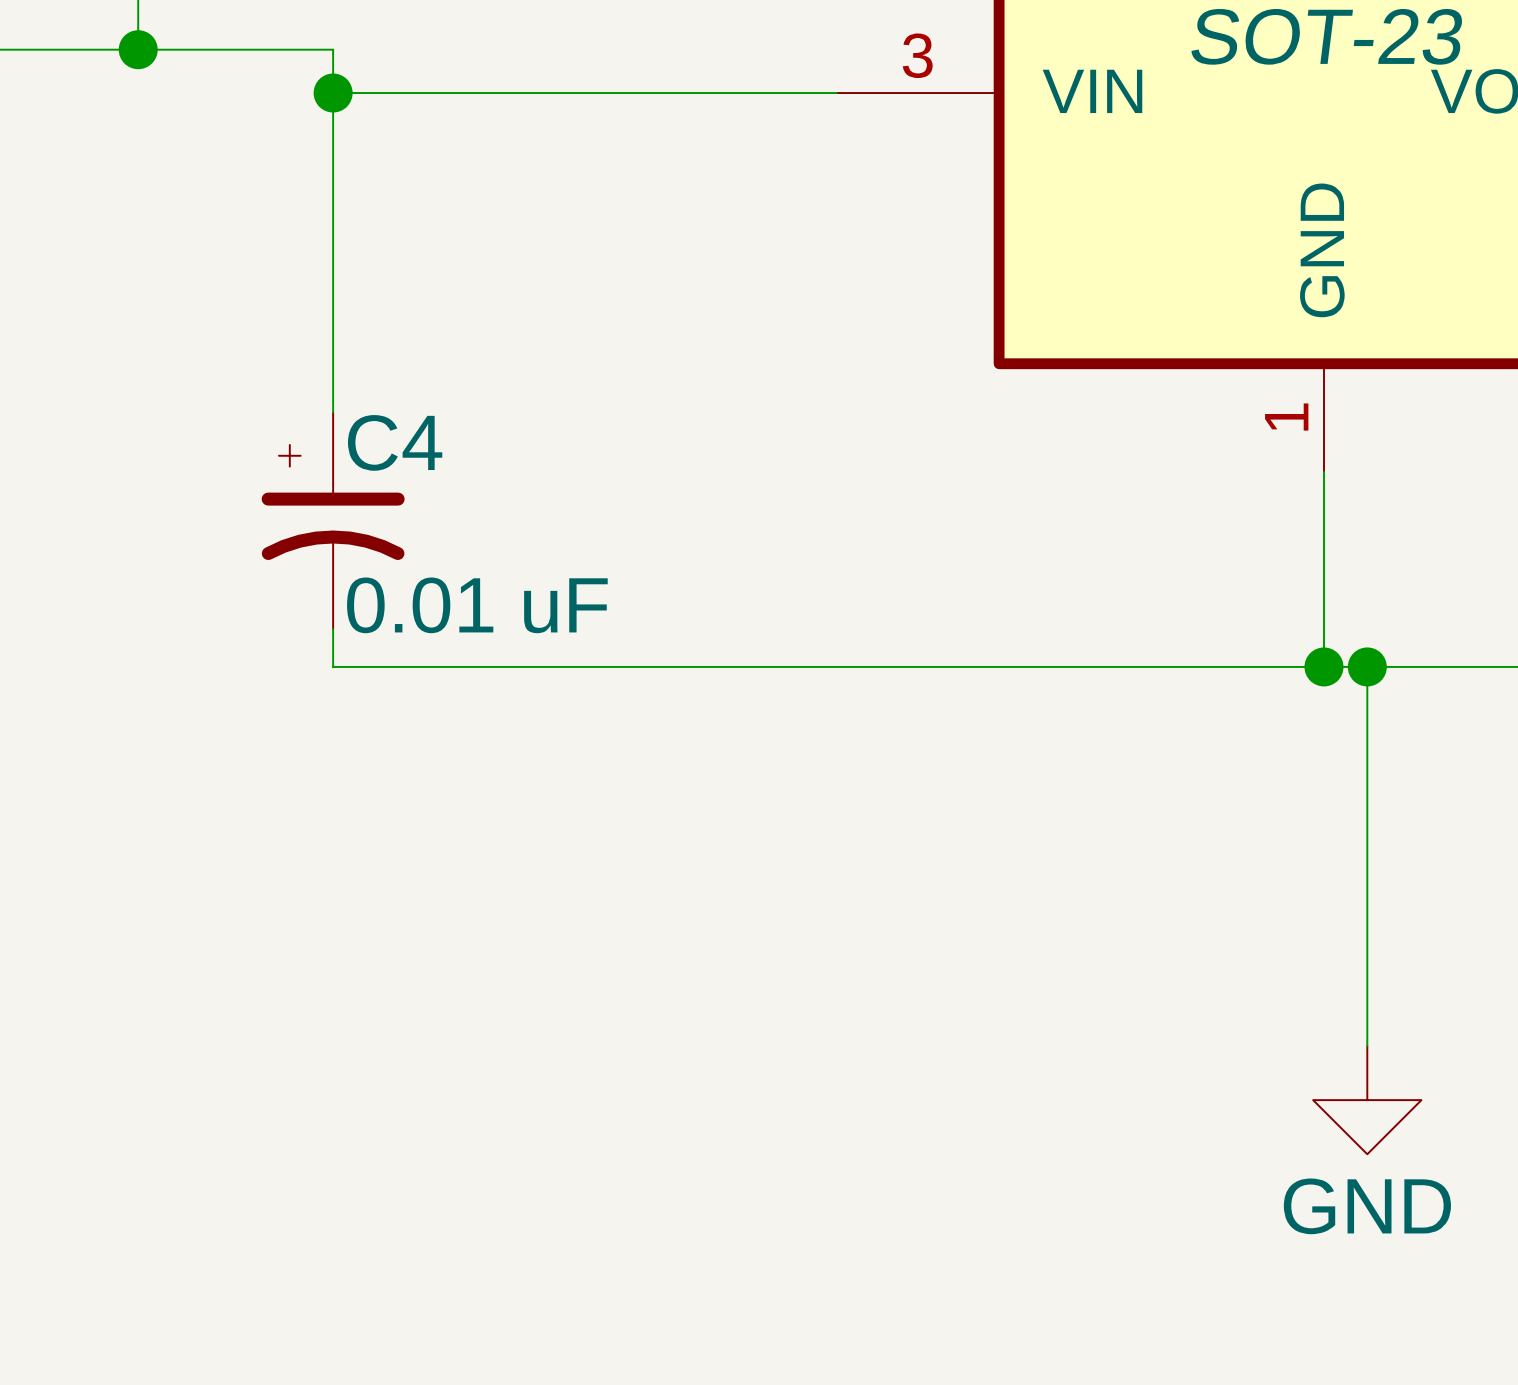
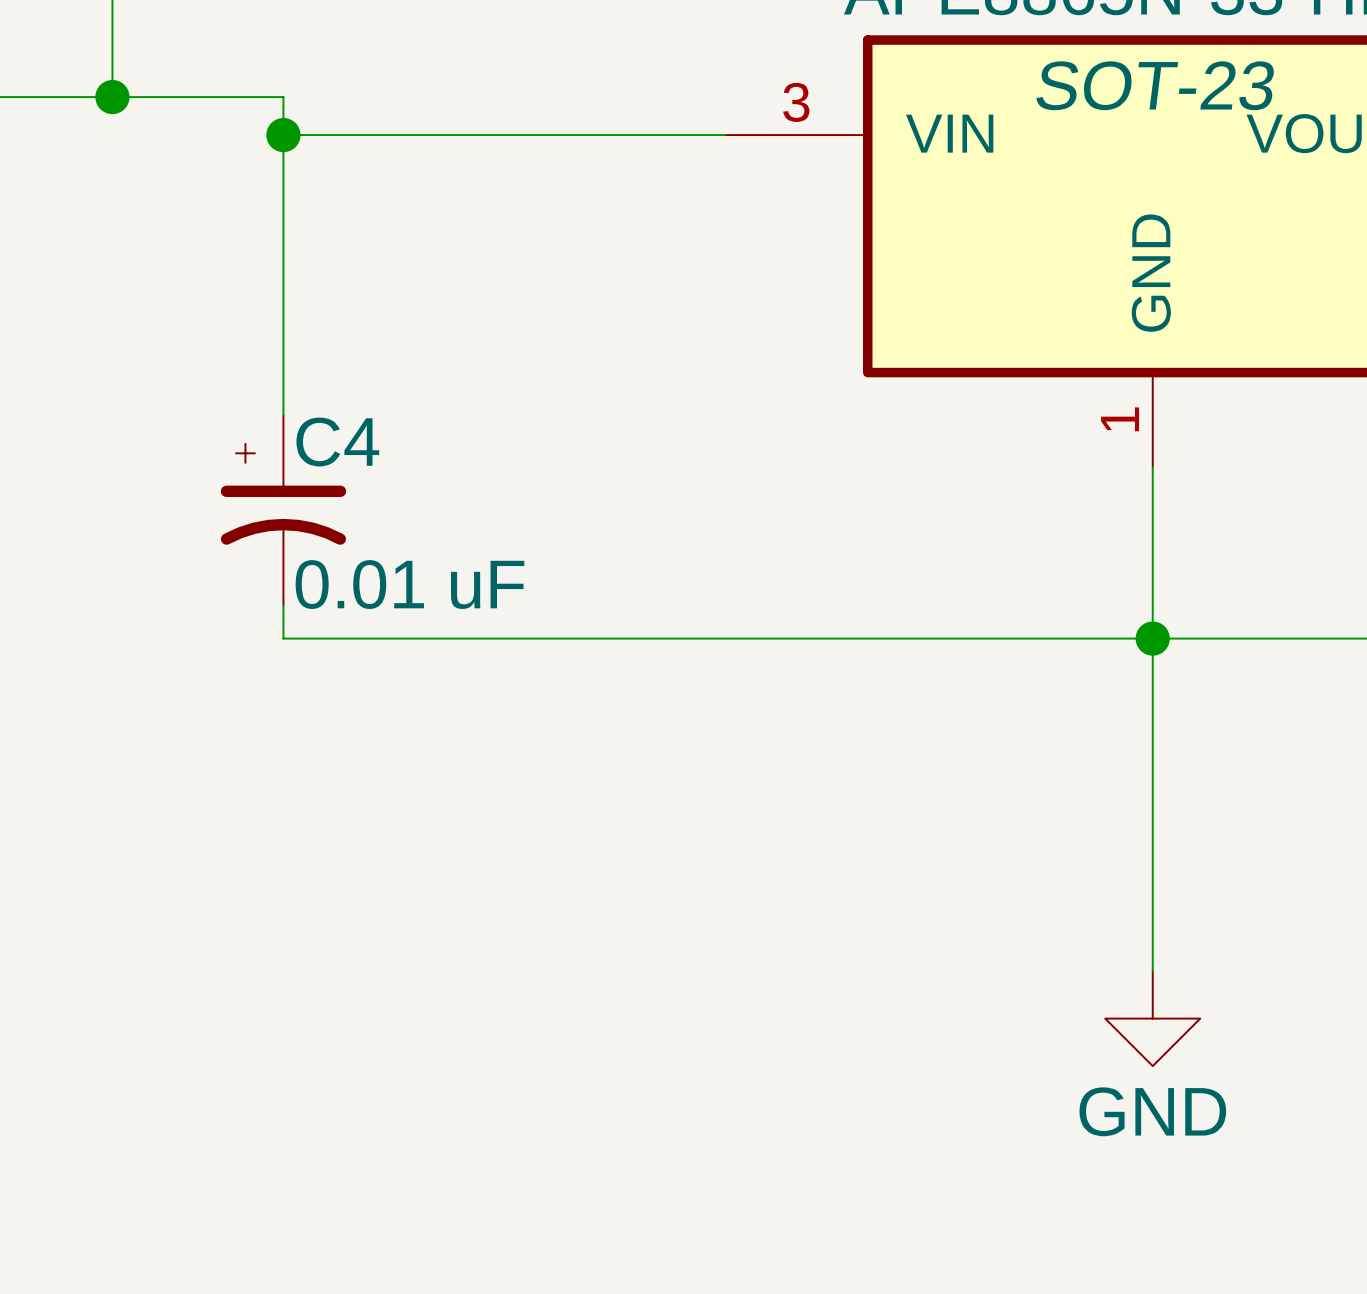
wire: (1367, 666) (1367, 1045) -> (1152, 638) (1152, 971)
junction: (1367, 666) -> none
power symbol position: GND (1367, 1100) -> GND (1152, 1018)

